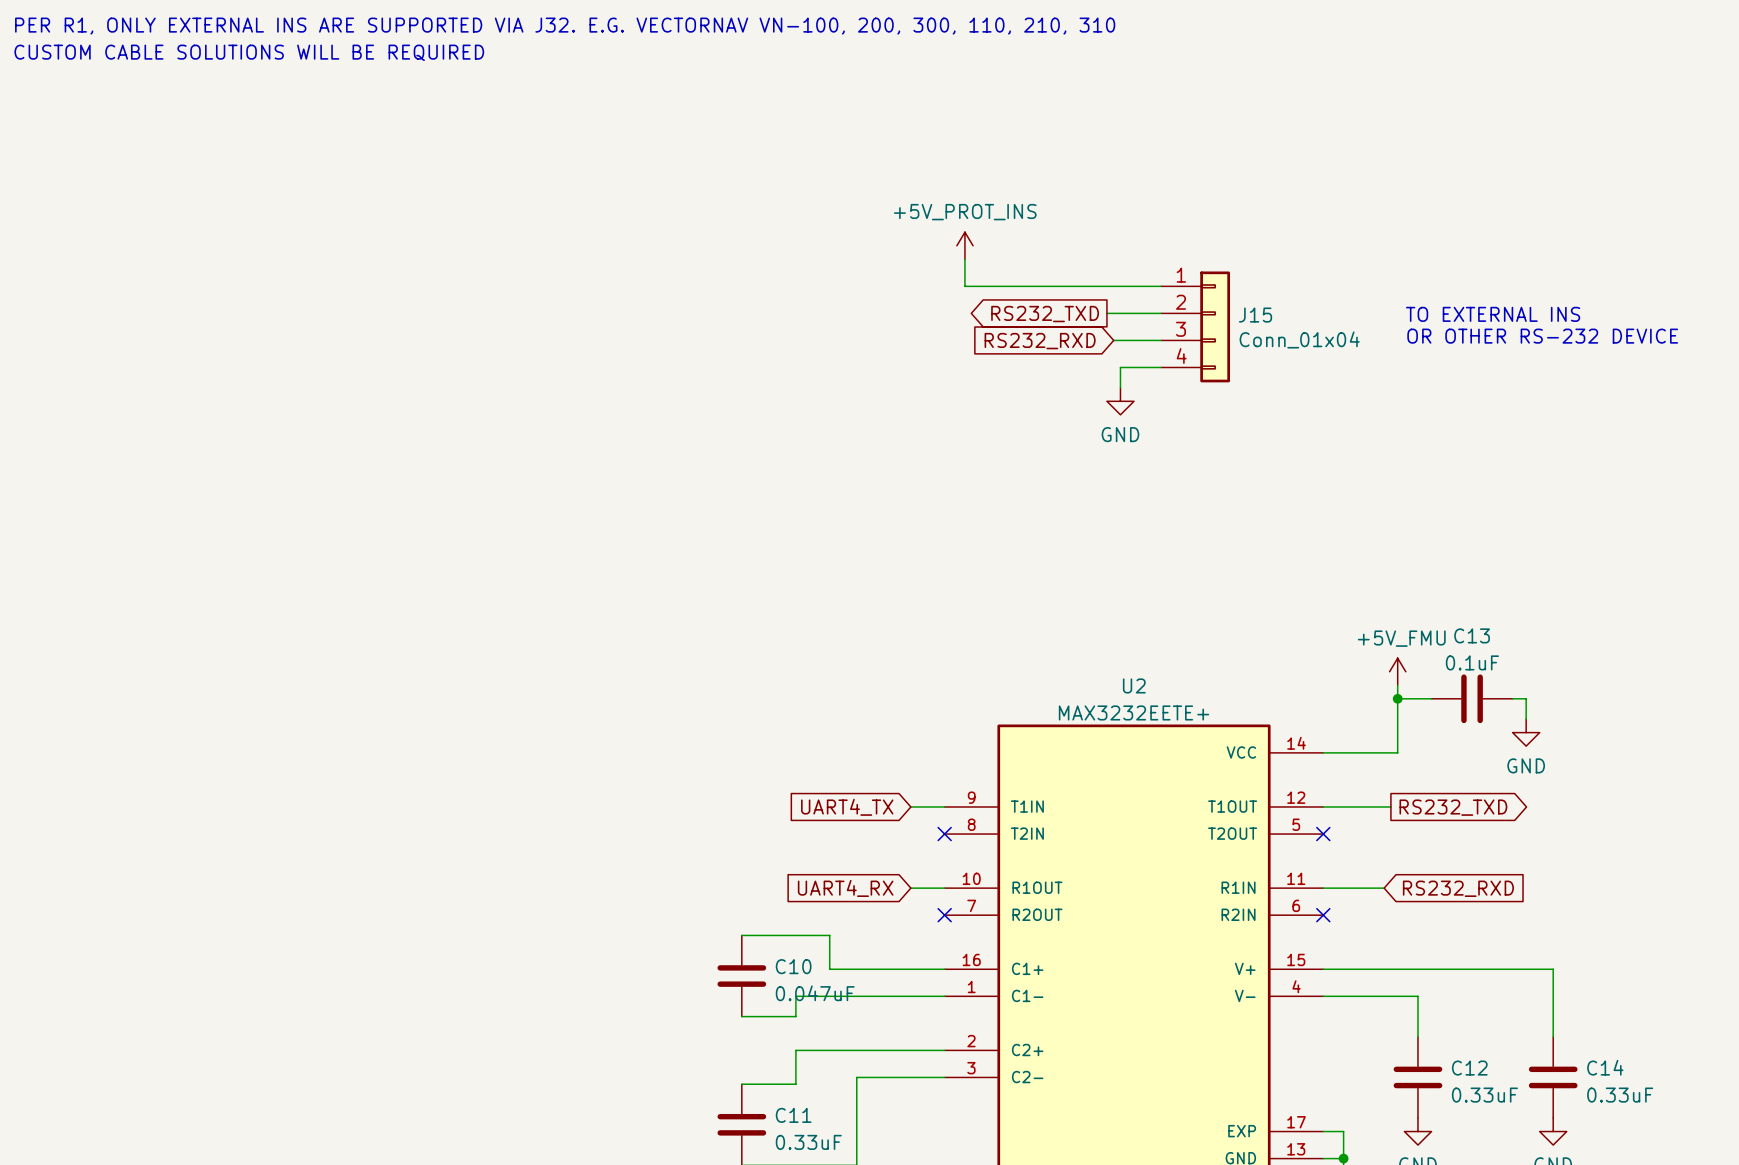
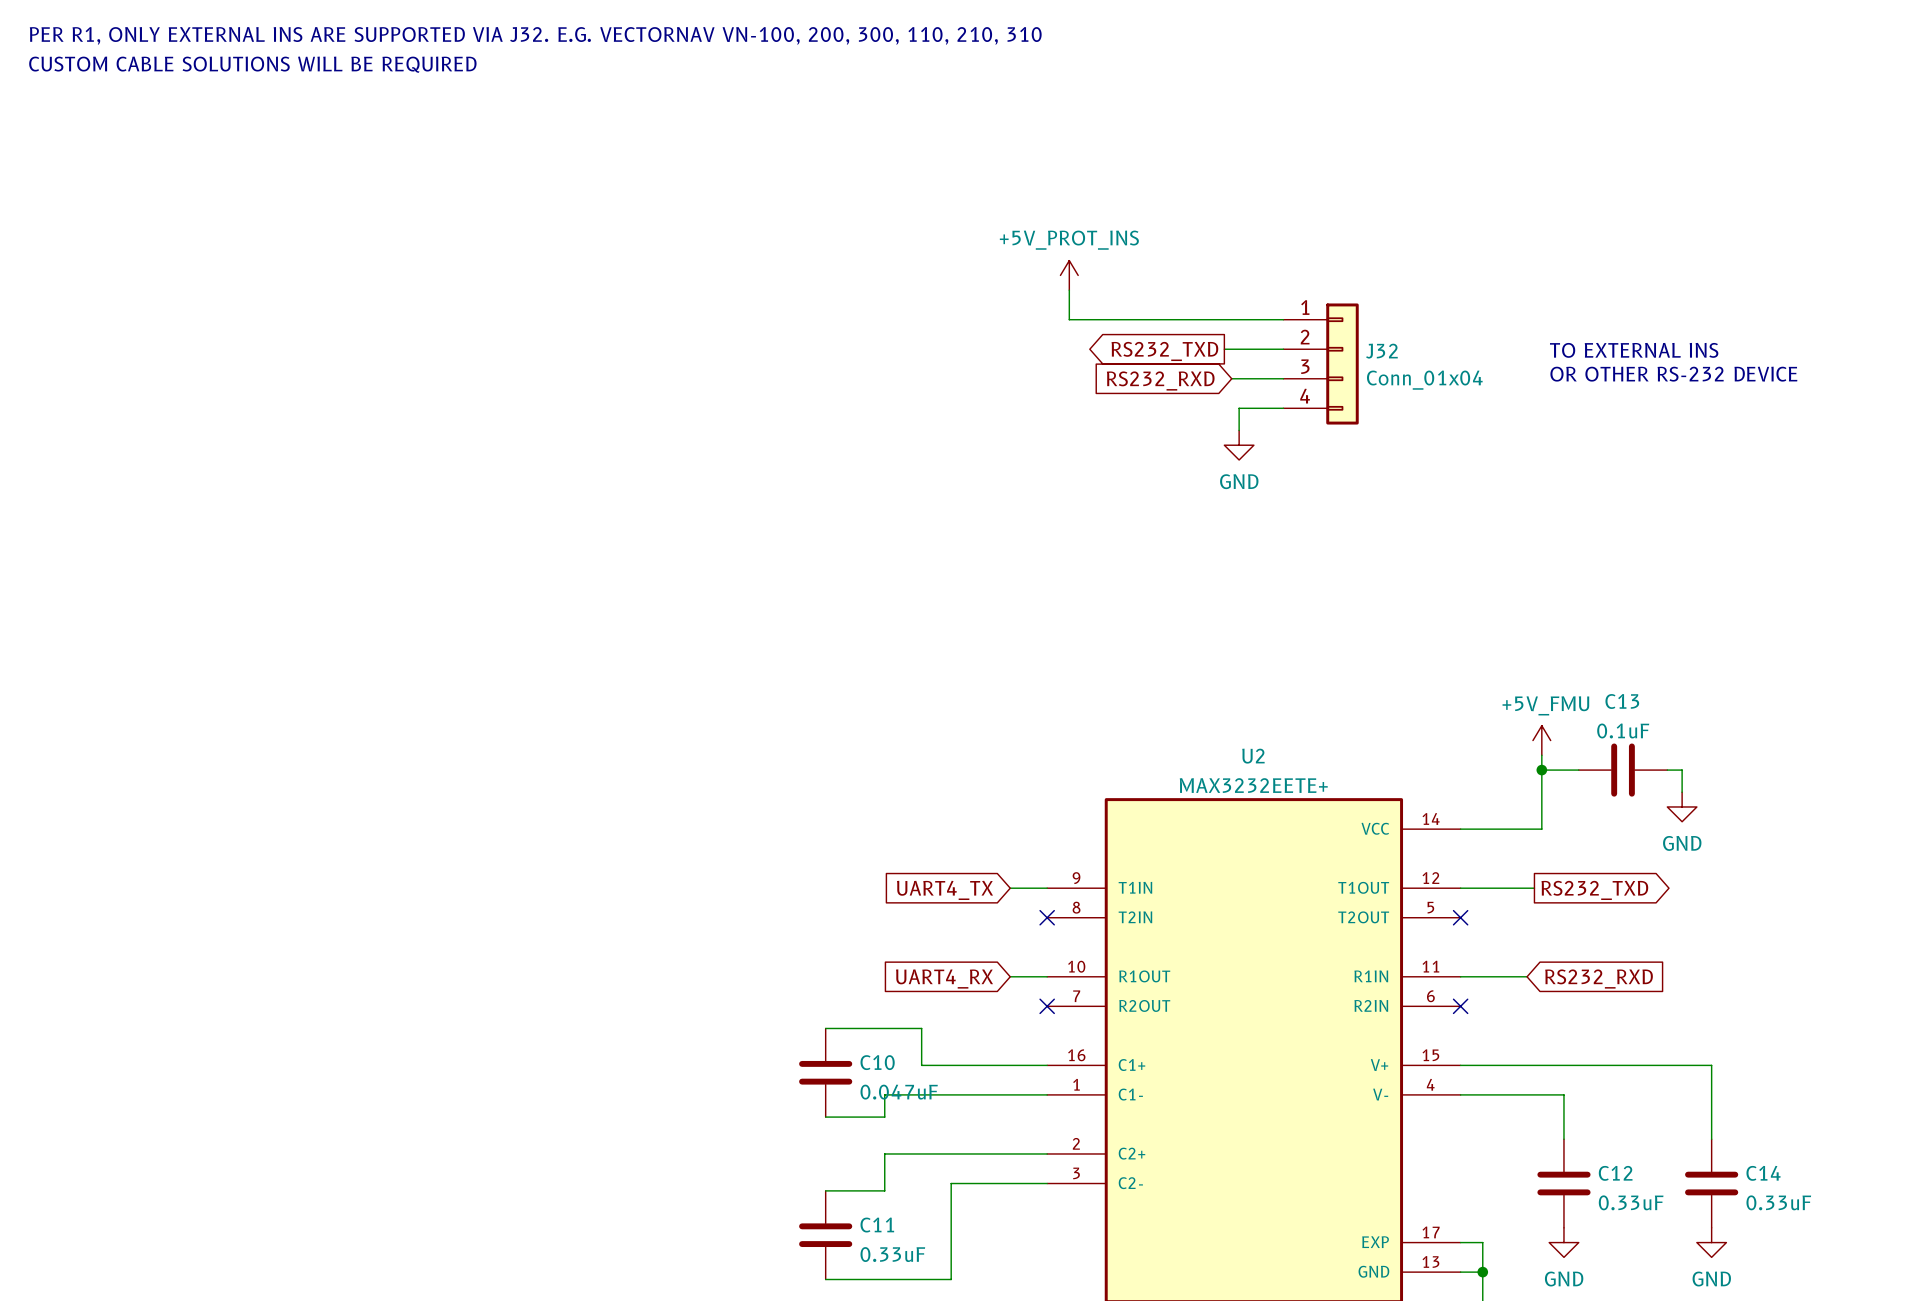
J15 name: J15 (1255, 315) -> J32 (1381, 351)

